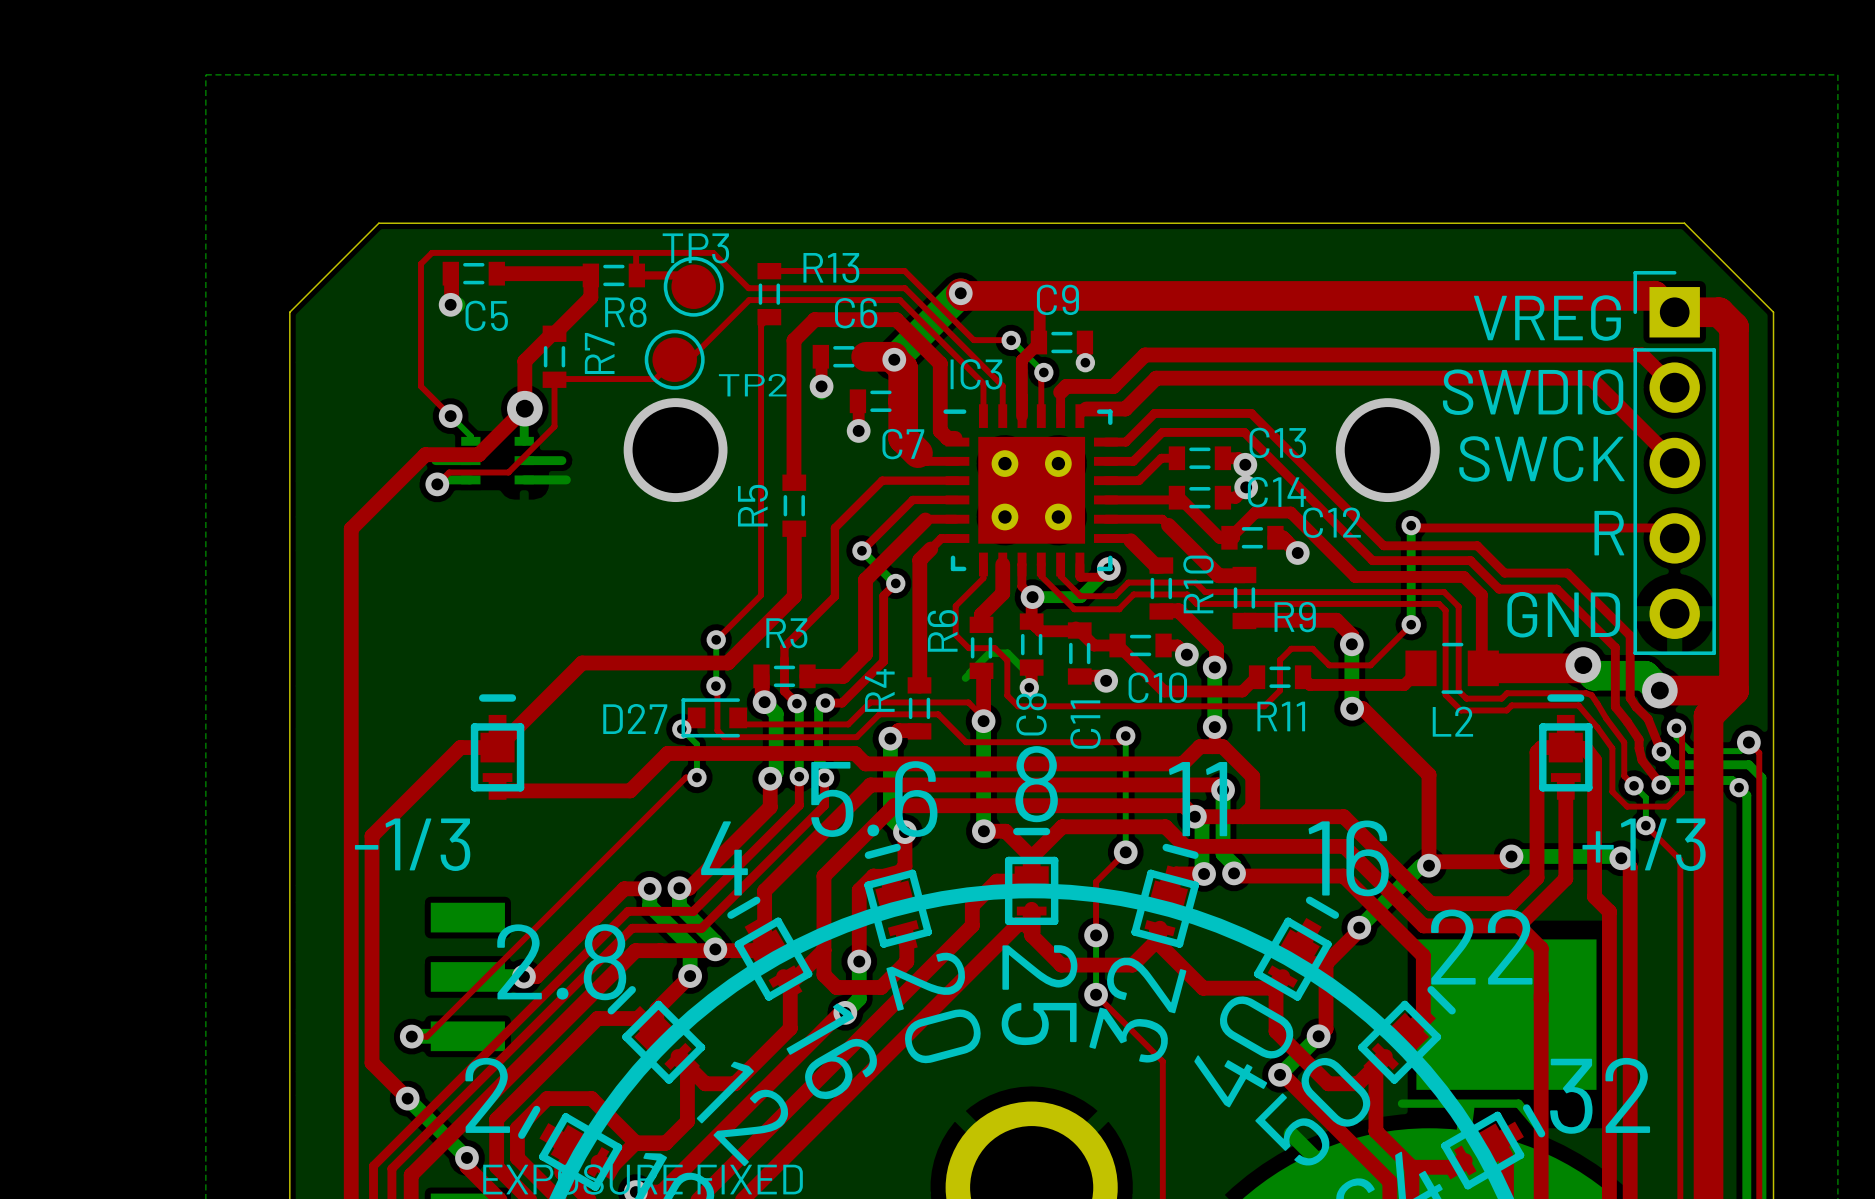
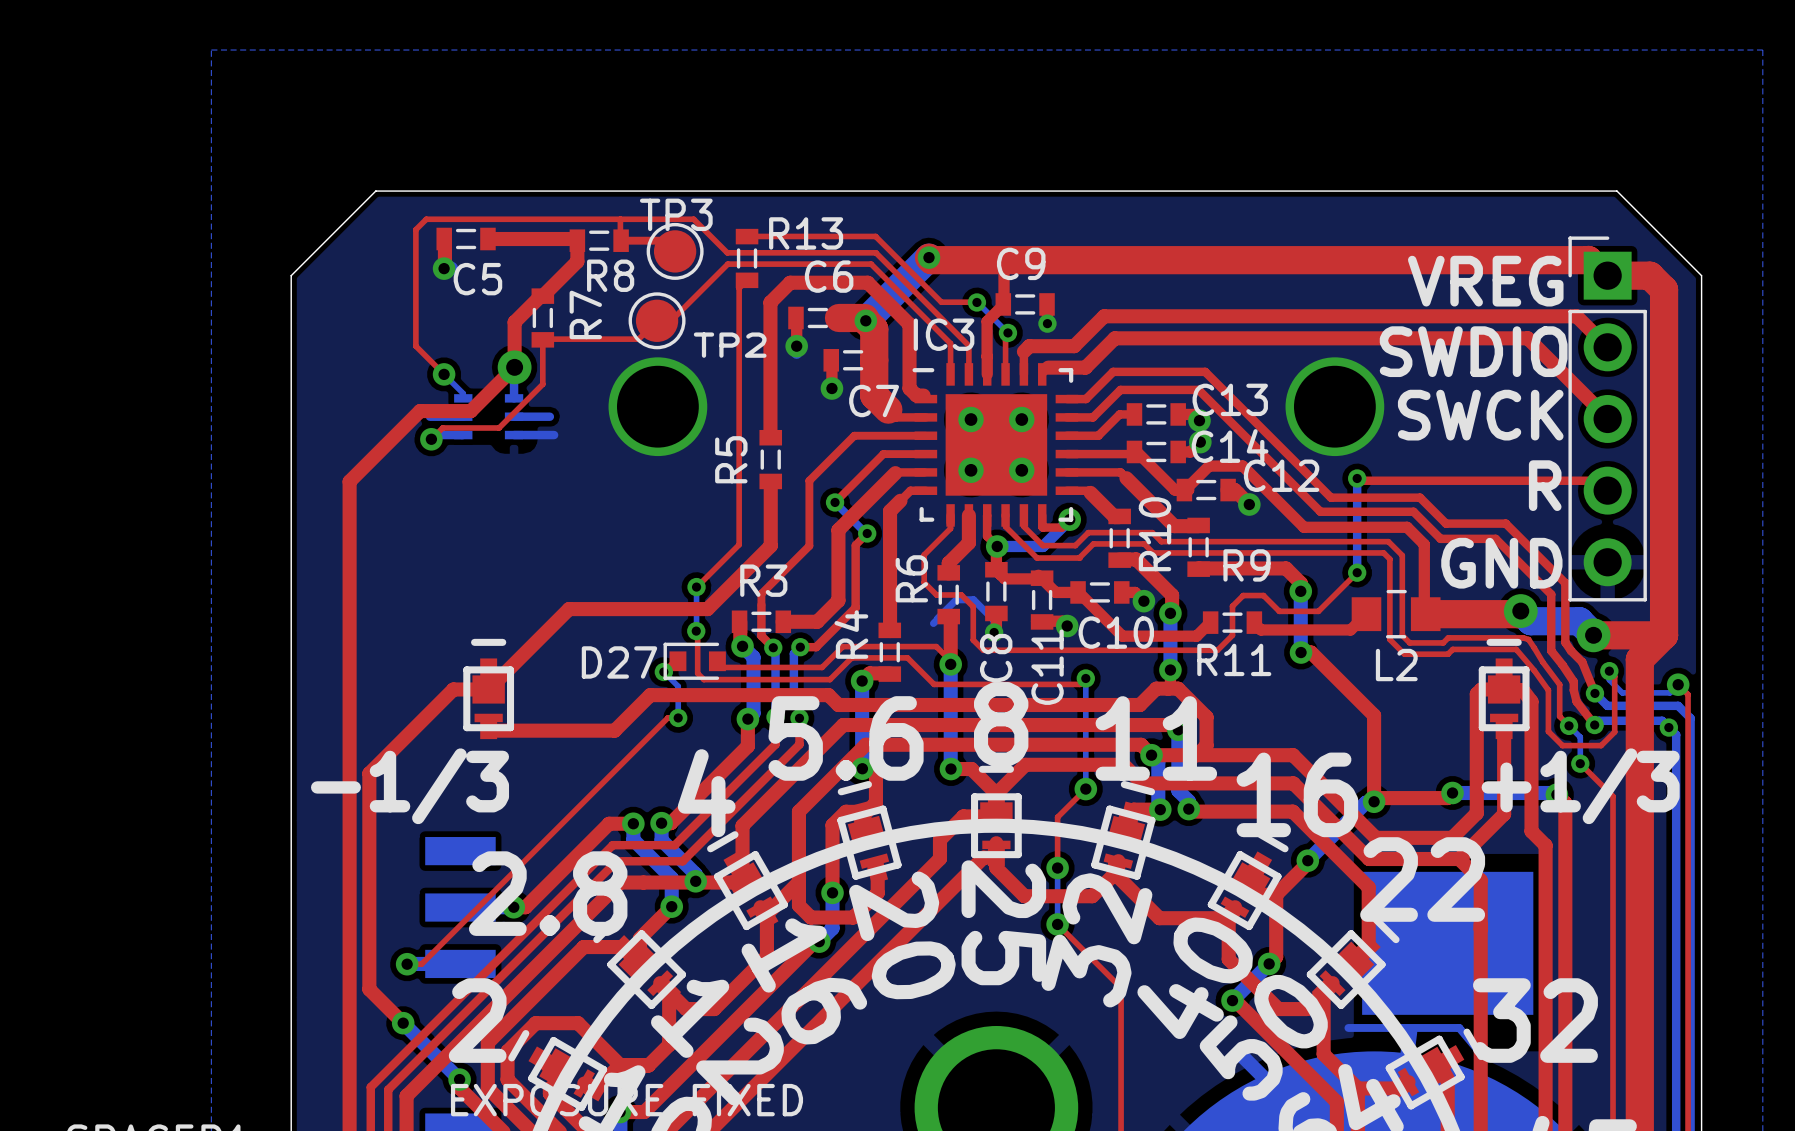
via position: (904, 832) -> (862, 768)

